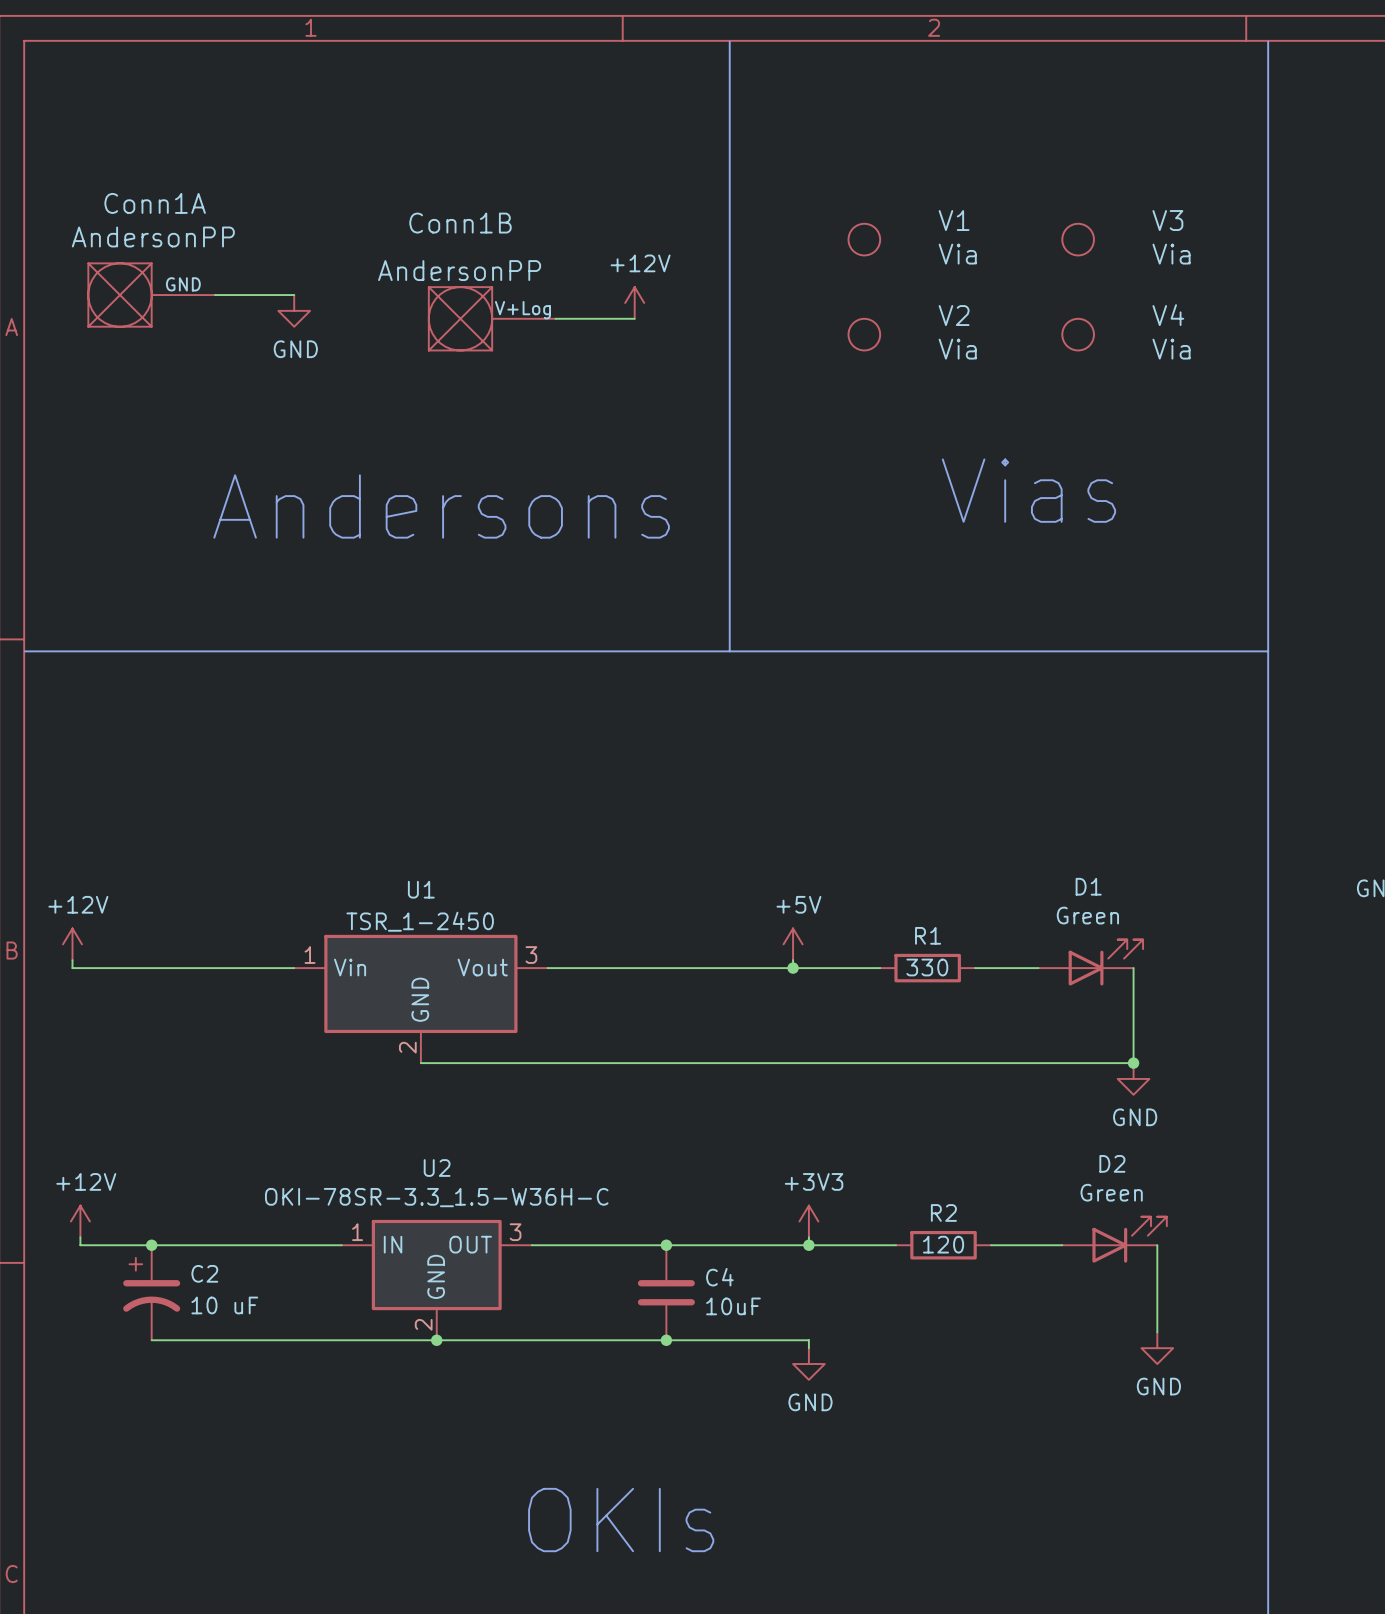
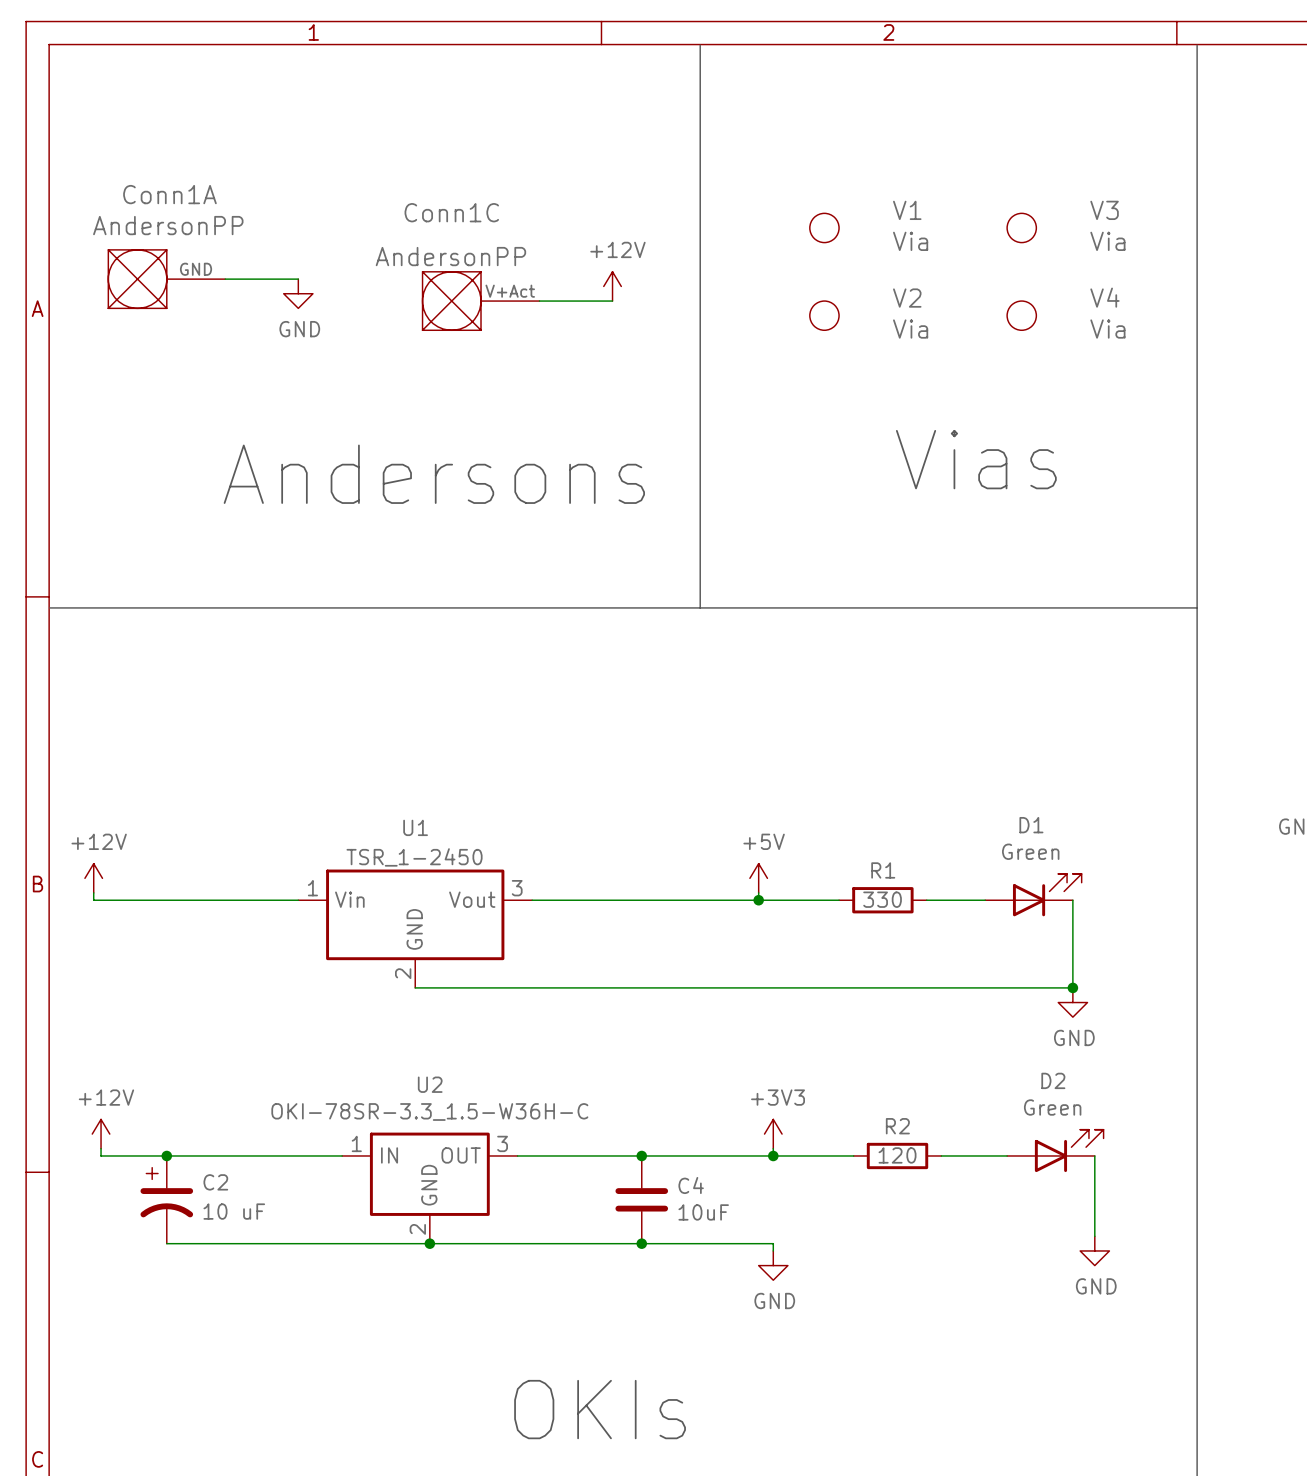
Conn1B name: Conn1B (460, 223) -> Conn1C (451, 212)
Conn1B pin name: V+Log (522, 310) -> V+Act (510, 291)

